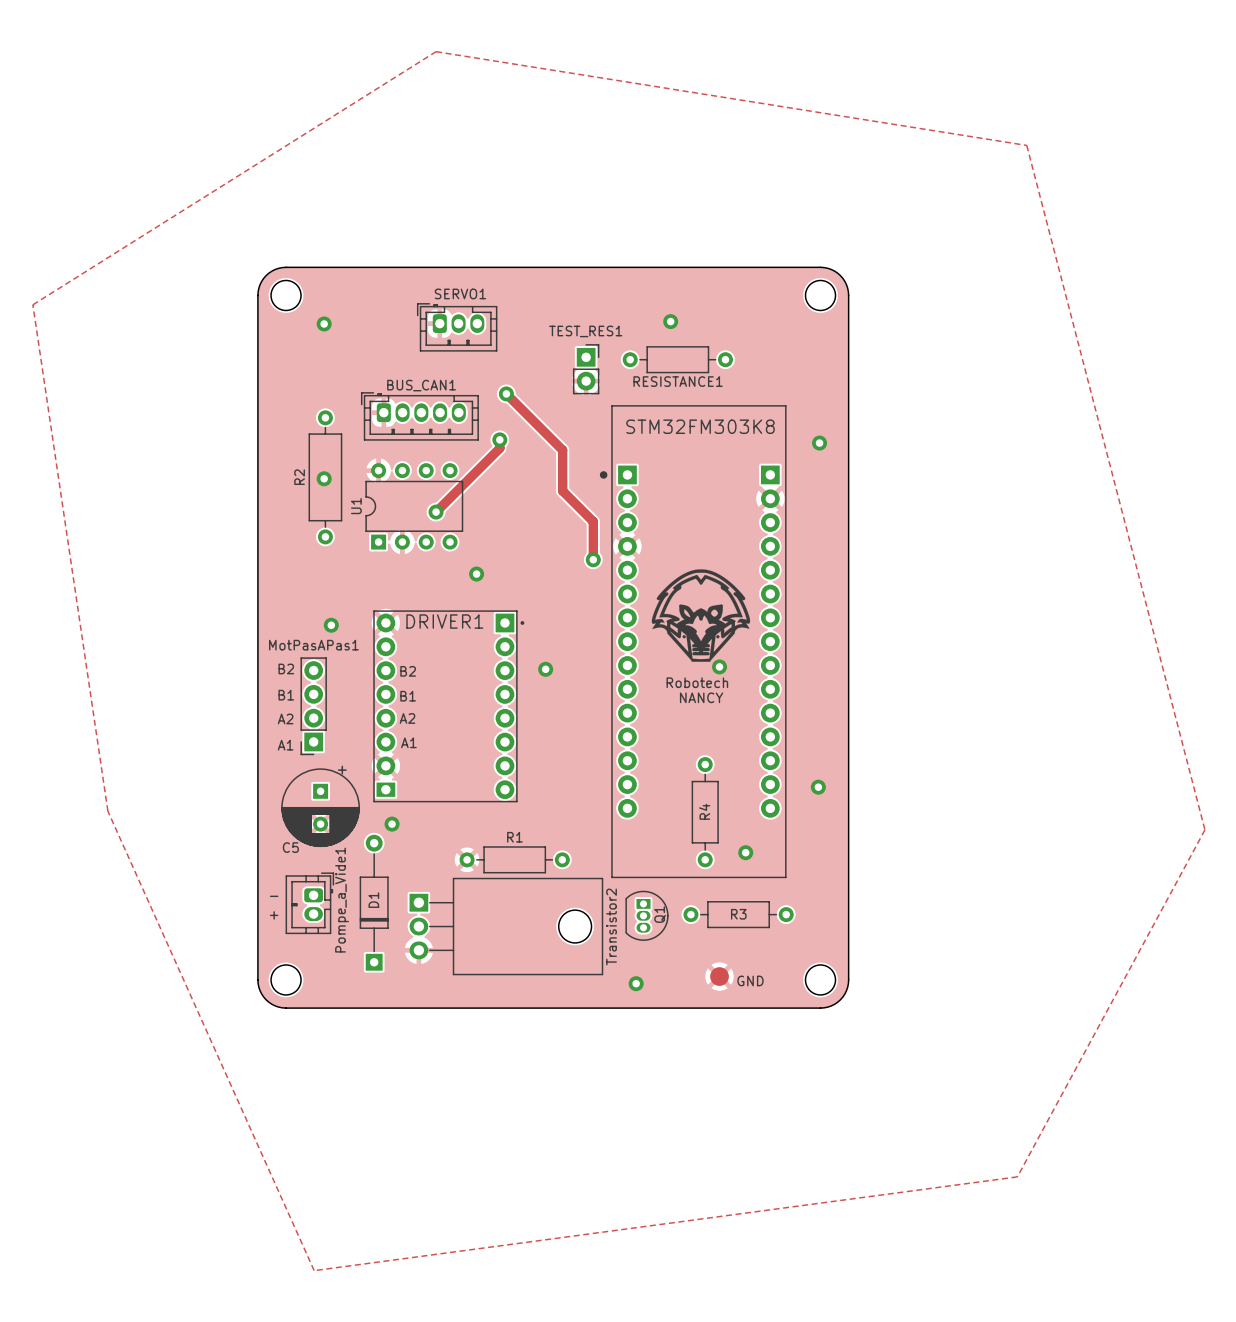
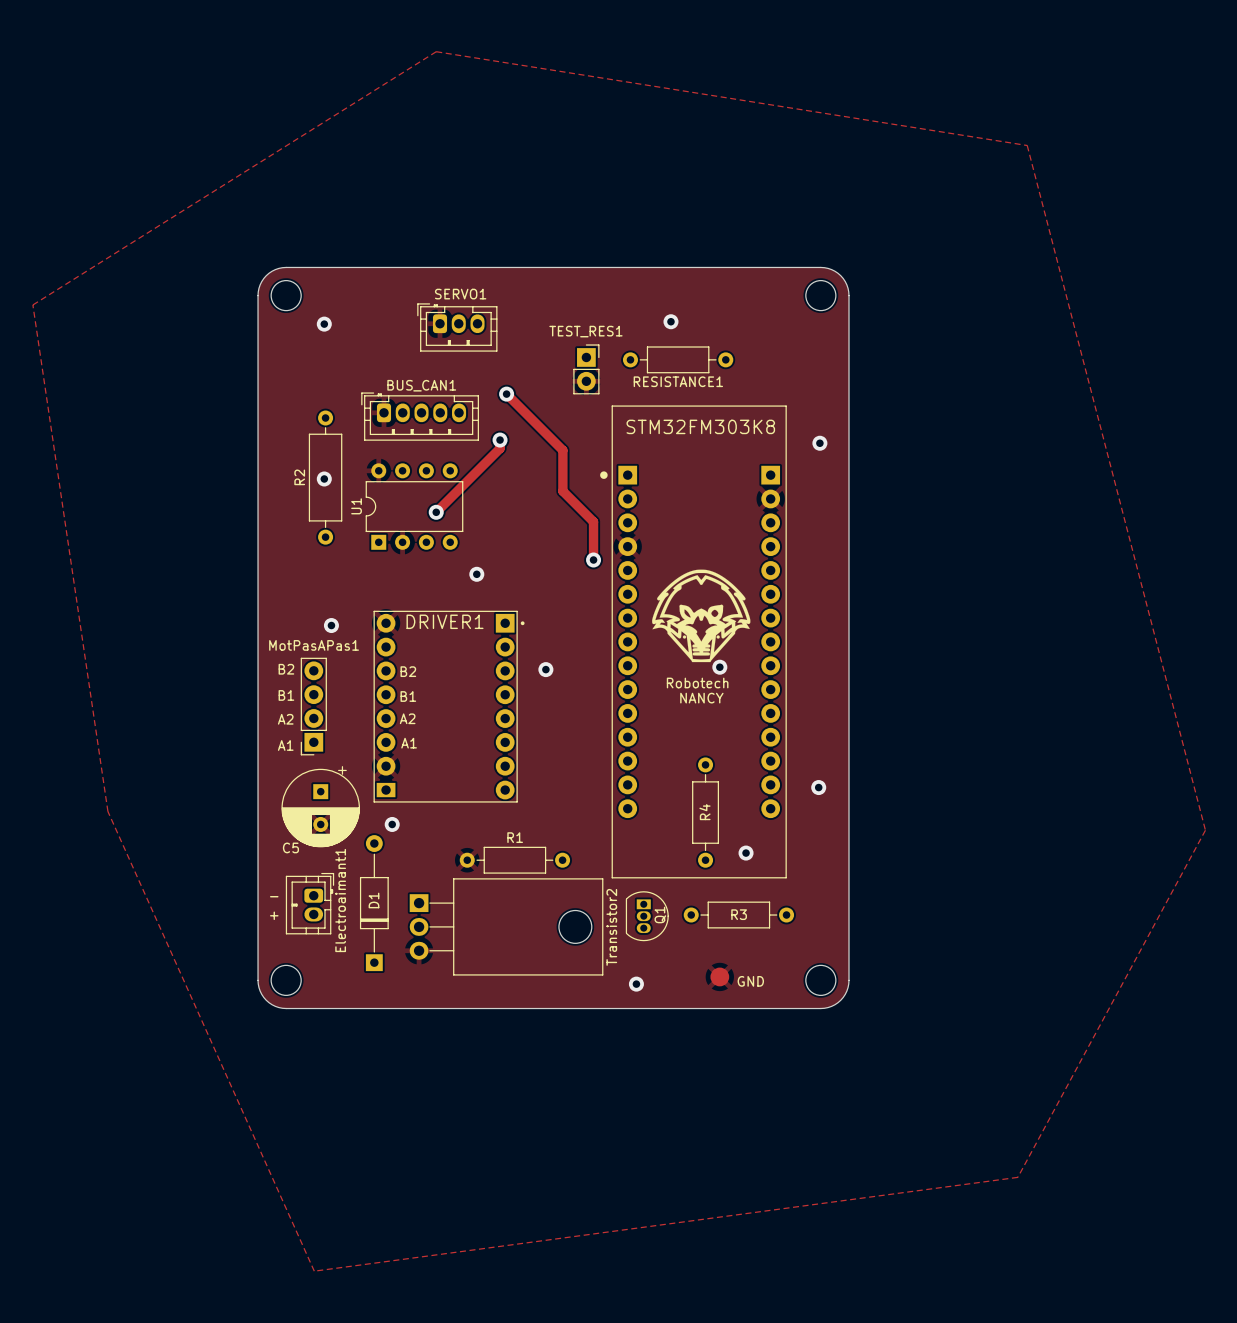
Pompe_a_Vide1 name: Pompe_a_Vide1 (342, 900) -> Electroaimant1 (340, 900)

